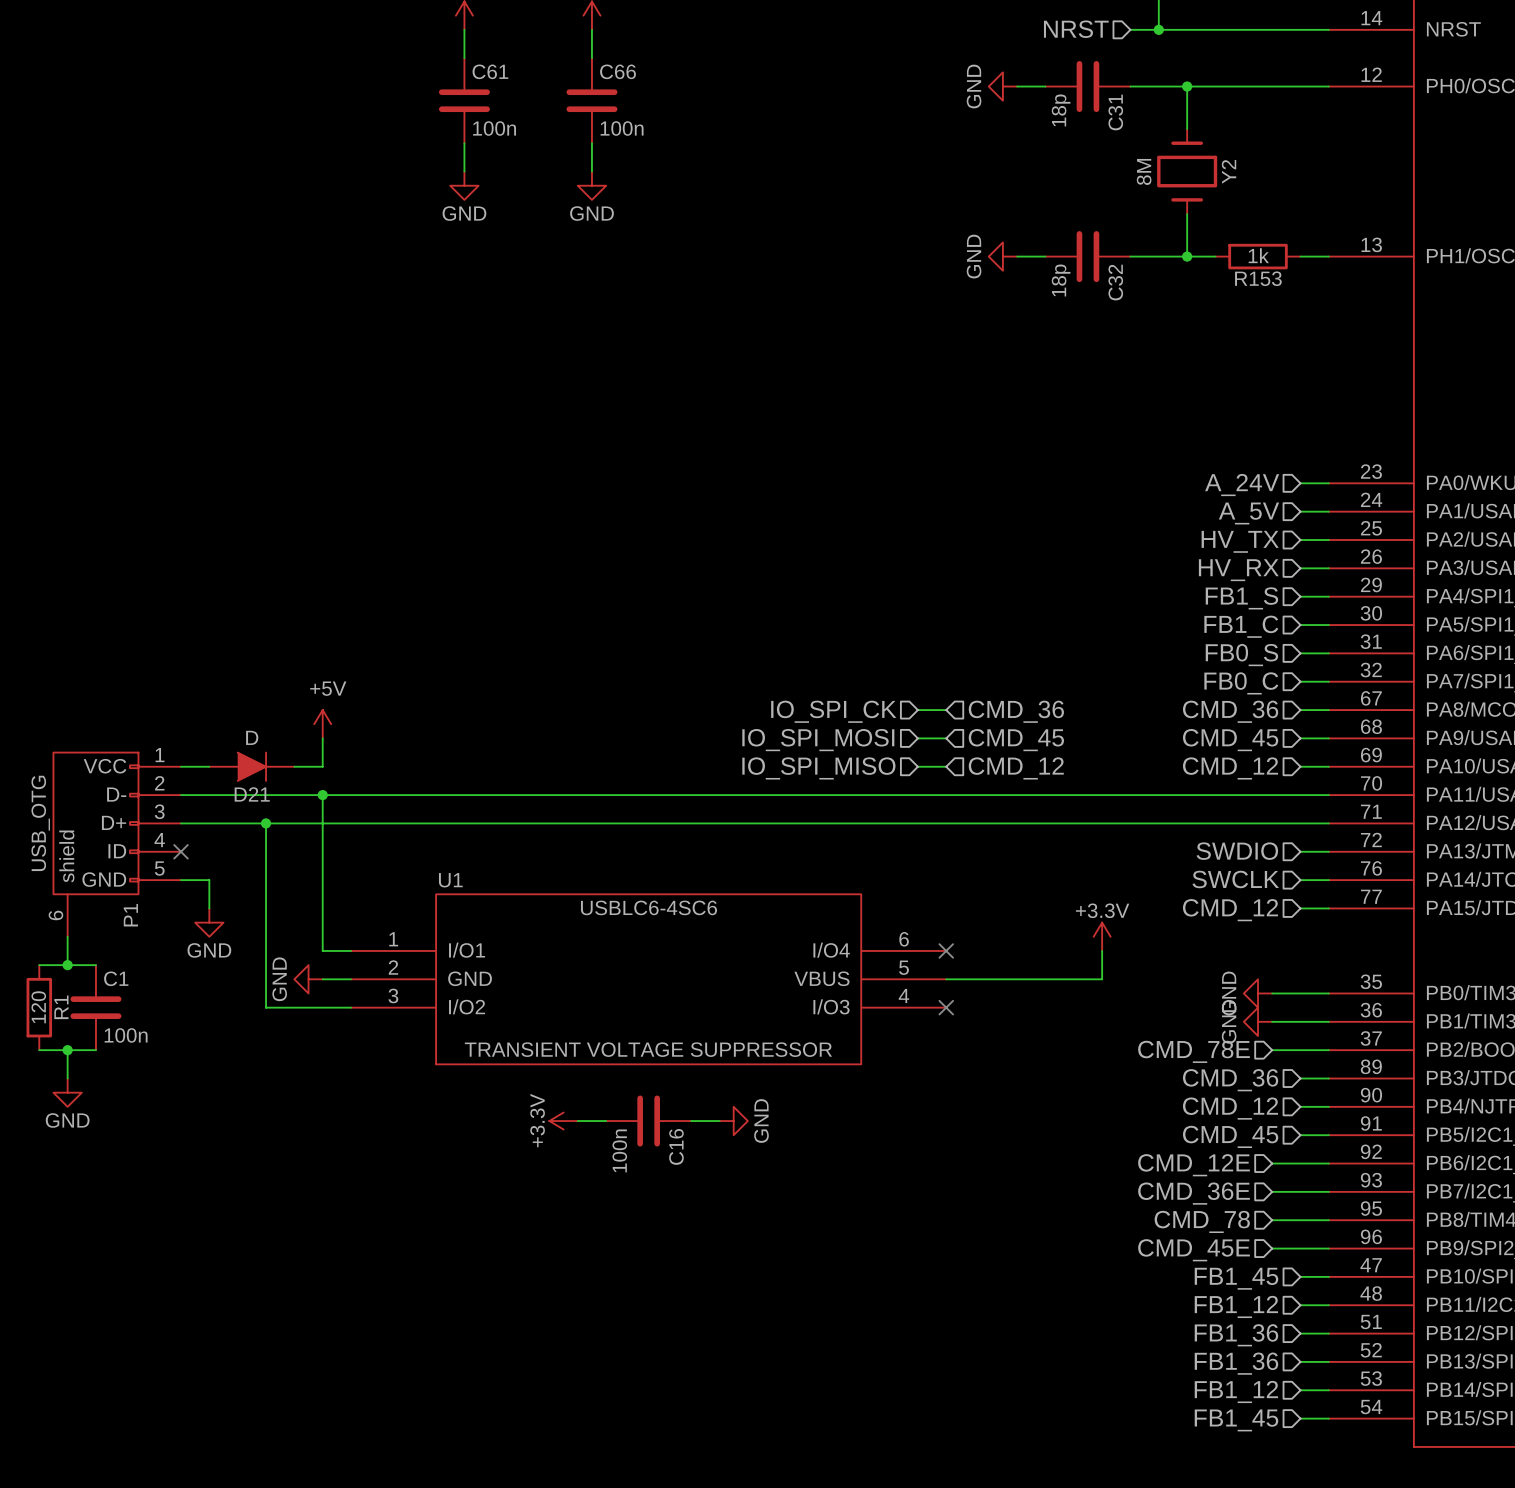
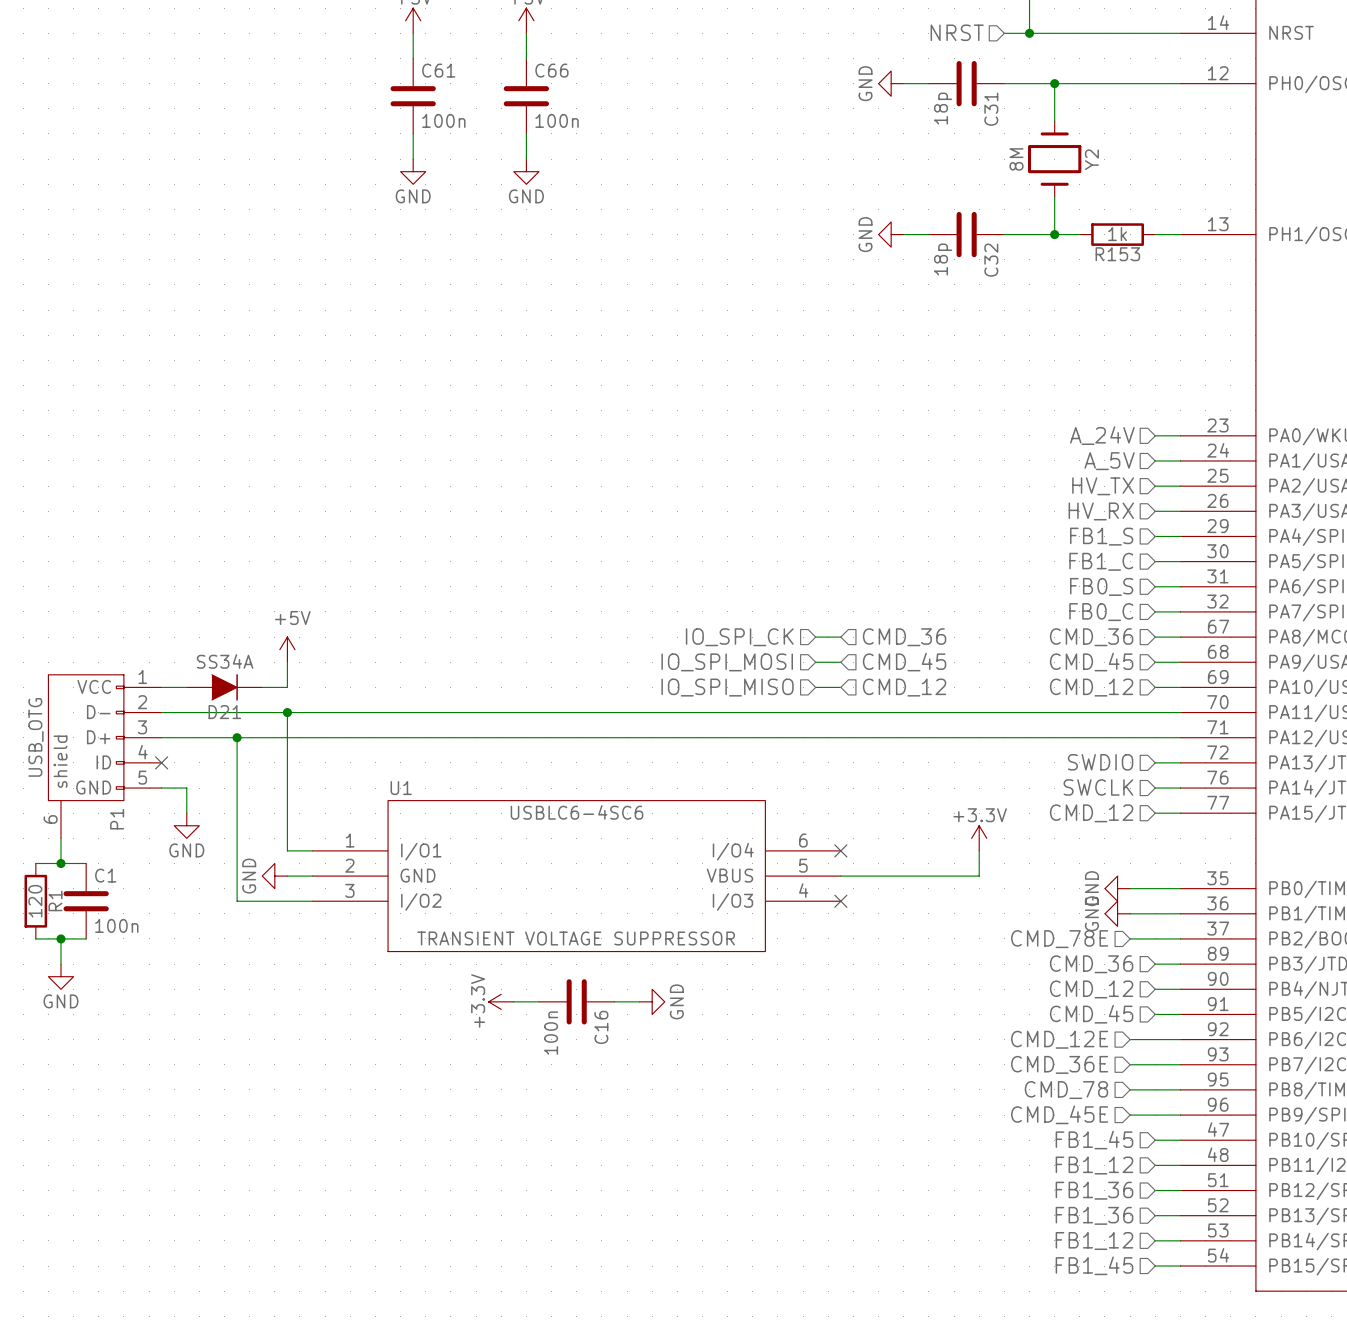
D21 value: D (252, 737) -> SS34A (225, 661)

